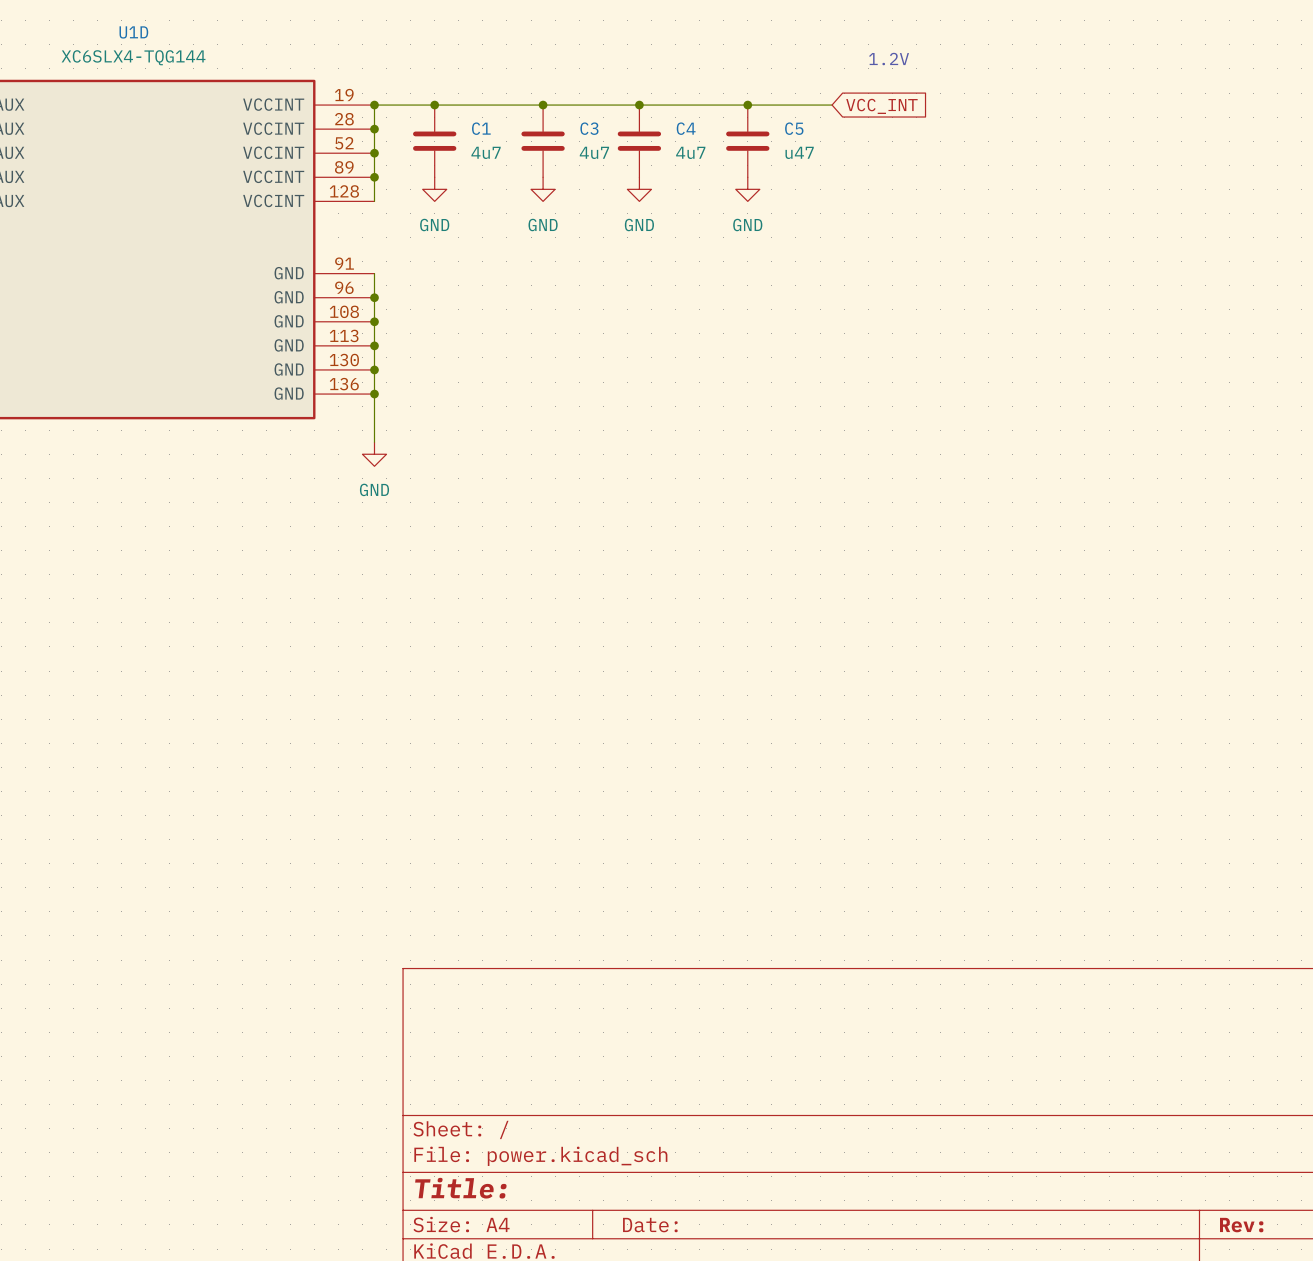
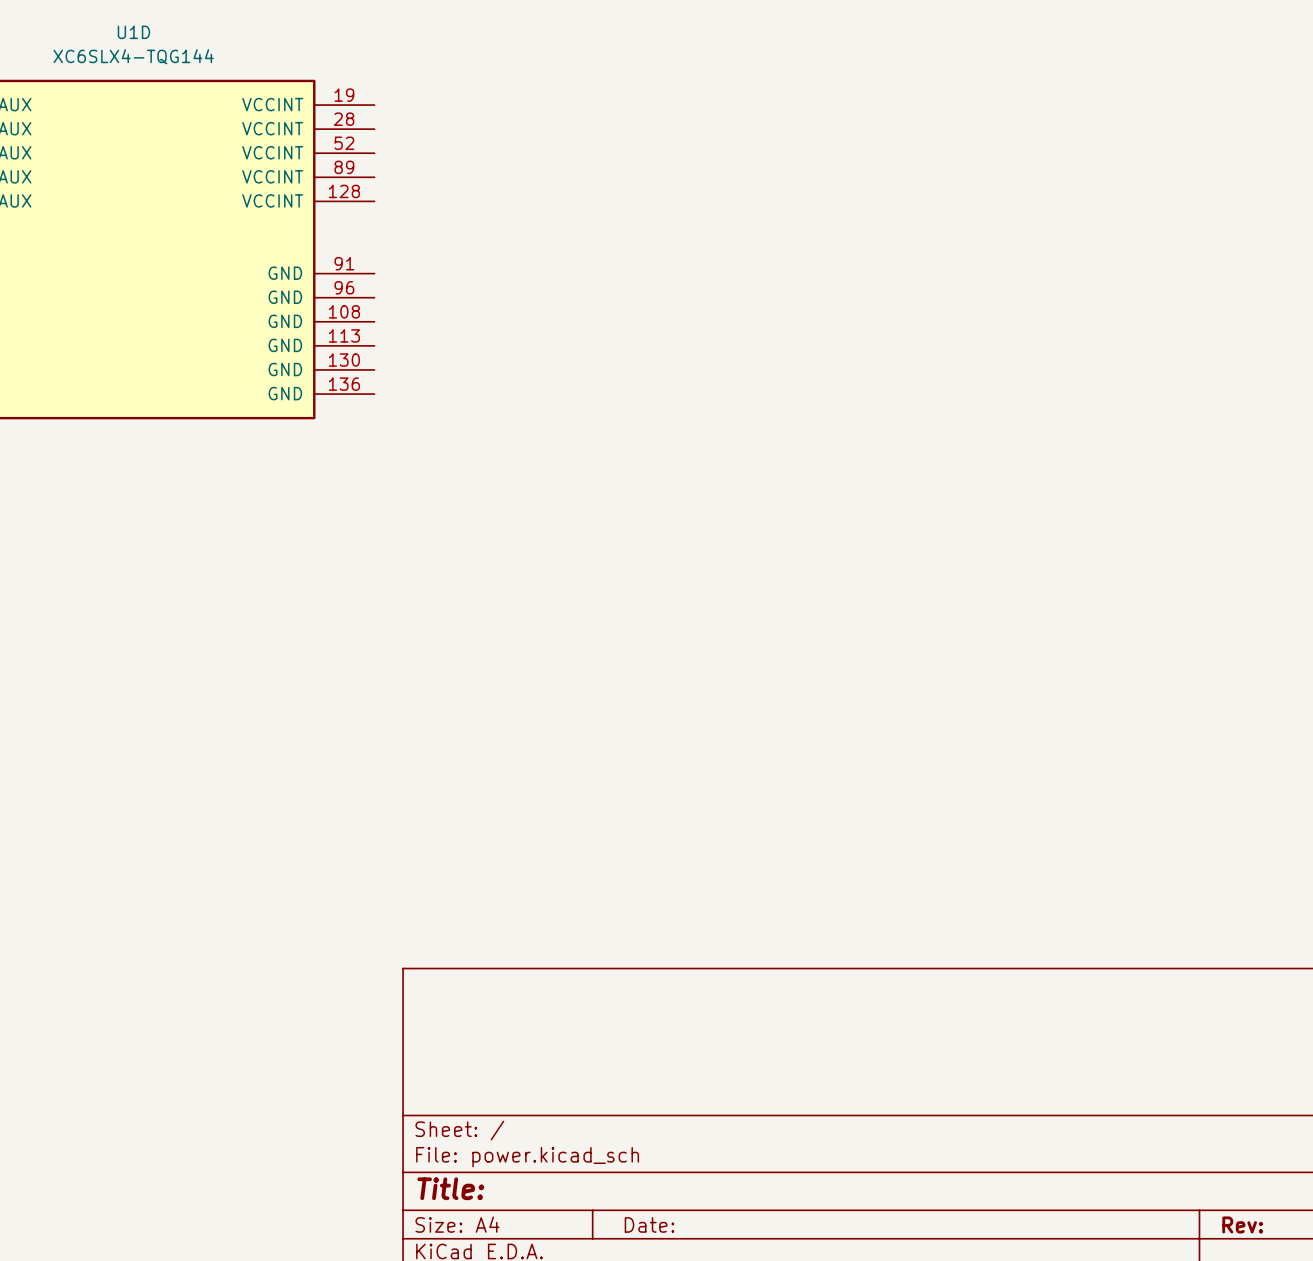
text: 1.2V (889, 59) -> none
junction: (374, 105) -> none
junction: (434, 105) -> none
junction: (543, 105) -> none
junction: (639, 105) -> none
junction: (747, 105) -> none
wire: (832, 105) (374, 105) (374, 201) -> none
global label: VCC_INT (881, 106) -> none
junction: (374, 129) -> none
C1: 4u7 (434, 141) -> none
C3: 4u7 (543, 141) -> none
C4: 4u7 (639, 141) -> none
C5: u47 (747, 141) -> none
junction: (374, 153) -> none
junction: (374, 177) -> none
power symbol: GND (434, 189) -> none
power symbol: GND (543, 189) -> none
power symbol: GND (639, 189) -> none
power symbol: GND (747, 189) -> none
wire: (374, 273) (374, 442) -> none
junction: (374, 297) -> none
junction: (374, 321) -> none
junction: (374, 345) -> none
junction: (374, 369) -> none
junction: (374, 394) -> none
power symbol: GND (374, 454) -> none

